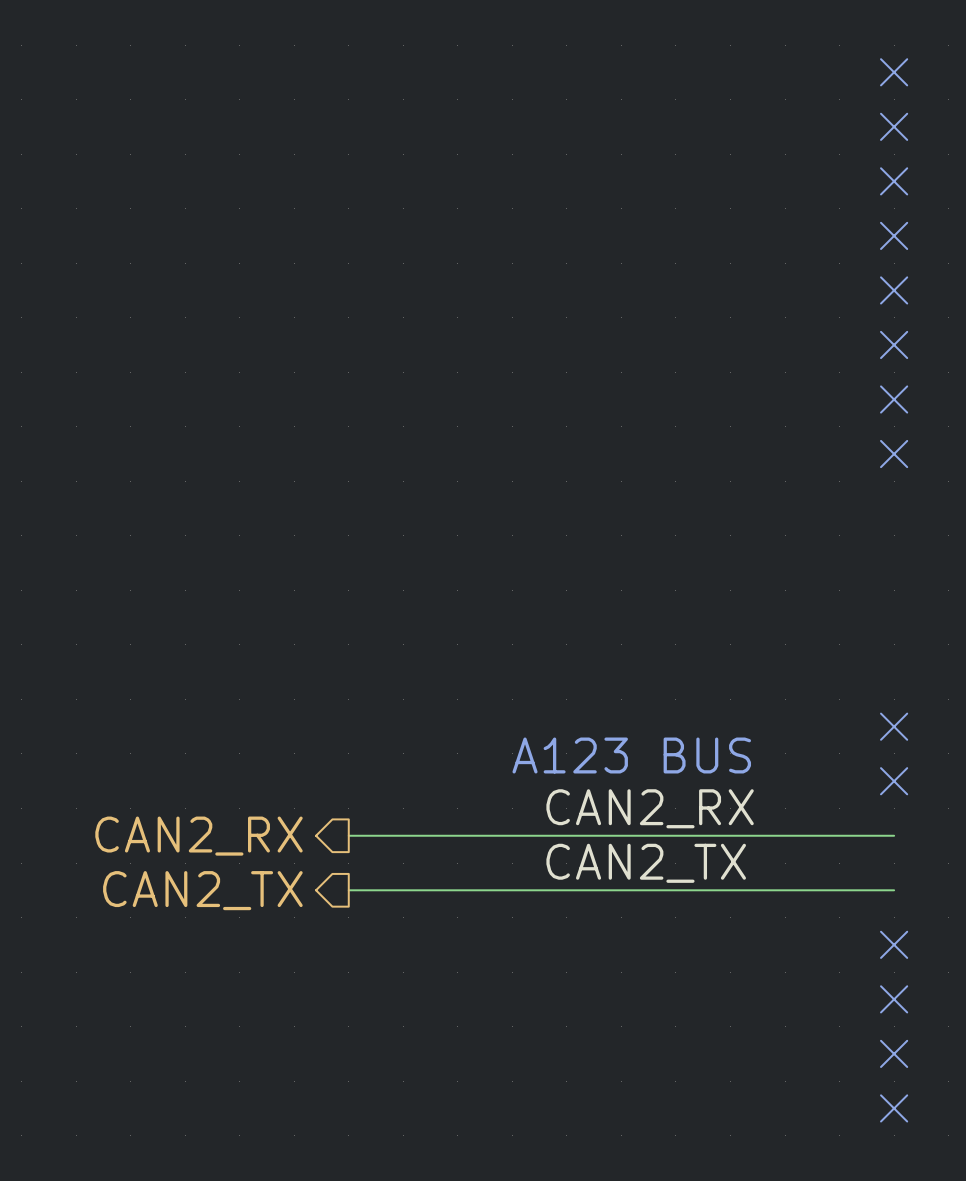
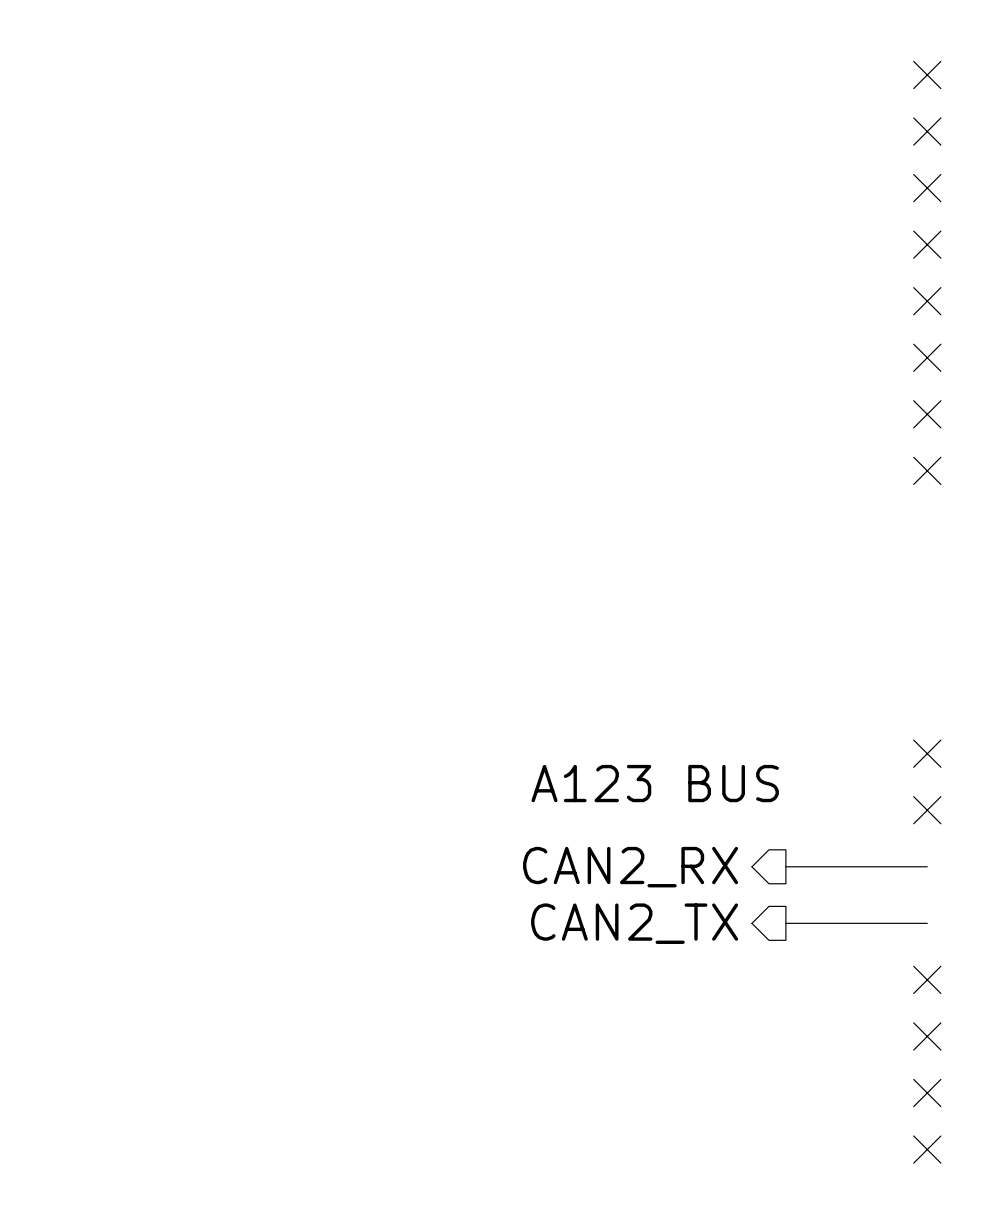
label: CAN2_RX (650, 808) -> none
wire: (348, 835) (757, 835) -> none
hierarchical label position: CAN2_RX (198, 836) -> CAN2_RX (630, 867)
label: CAN2_TX (646, 863) -> none
hierarchical label position: CAN2_TX (202, 890) -> CAN2_TX (634, 923)
wire: (348, 890) (757, 890) -> none

